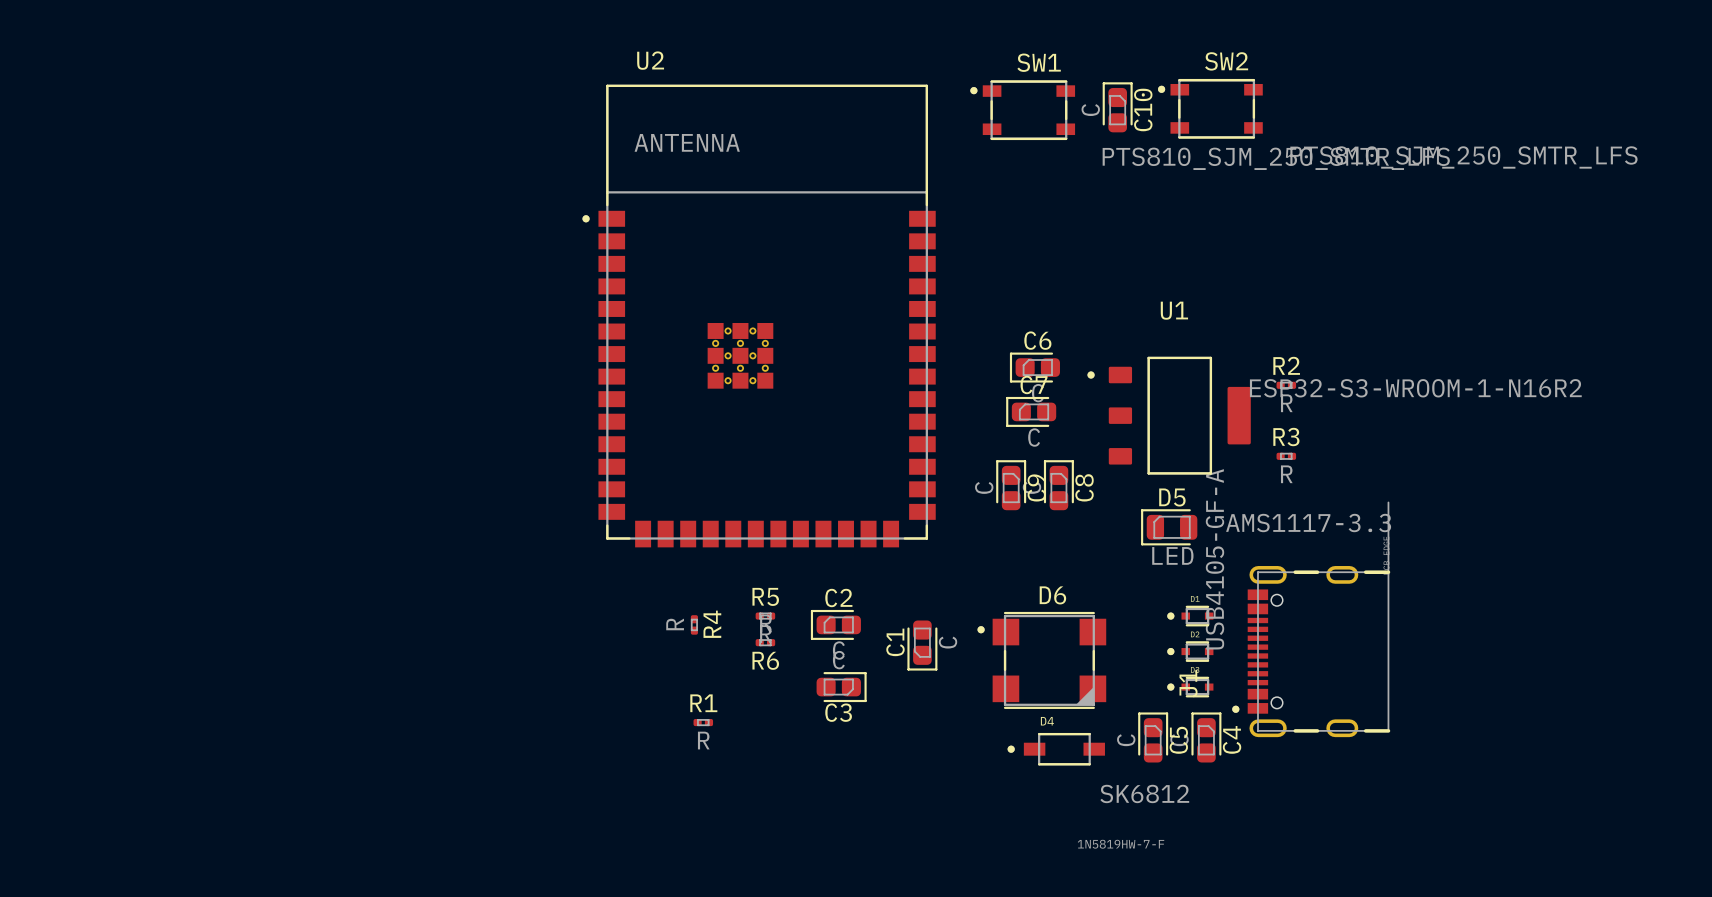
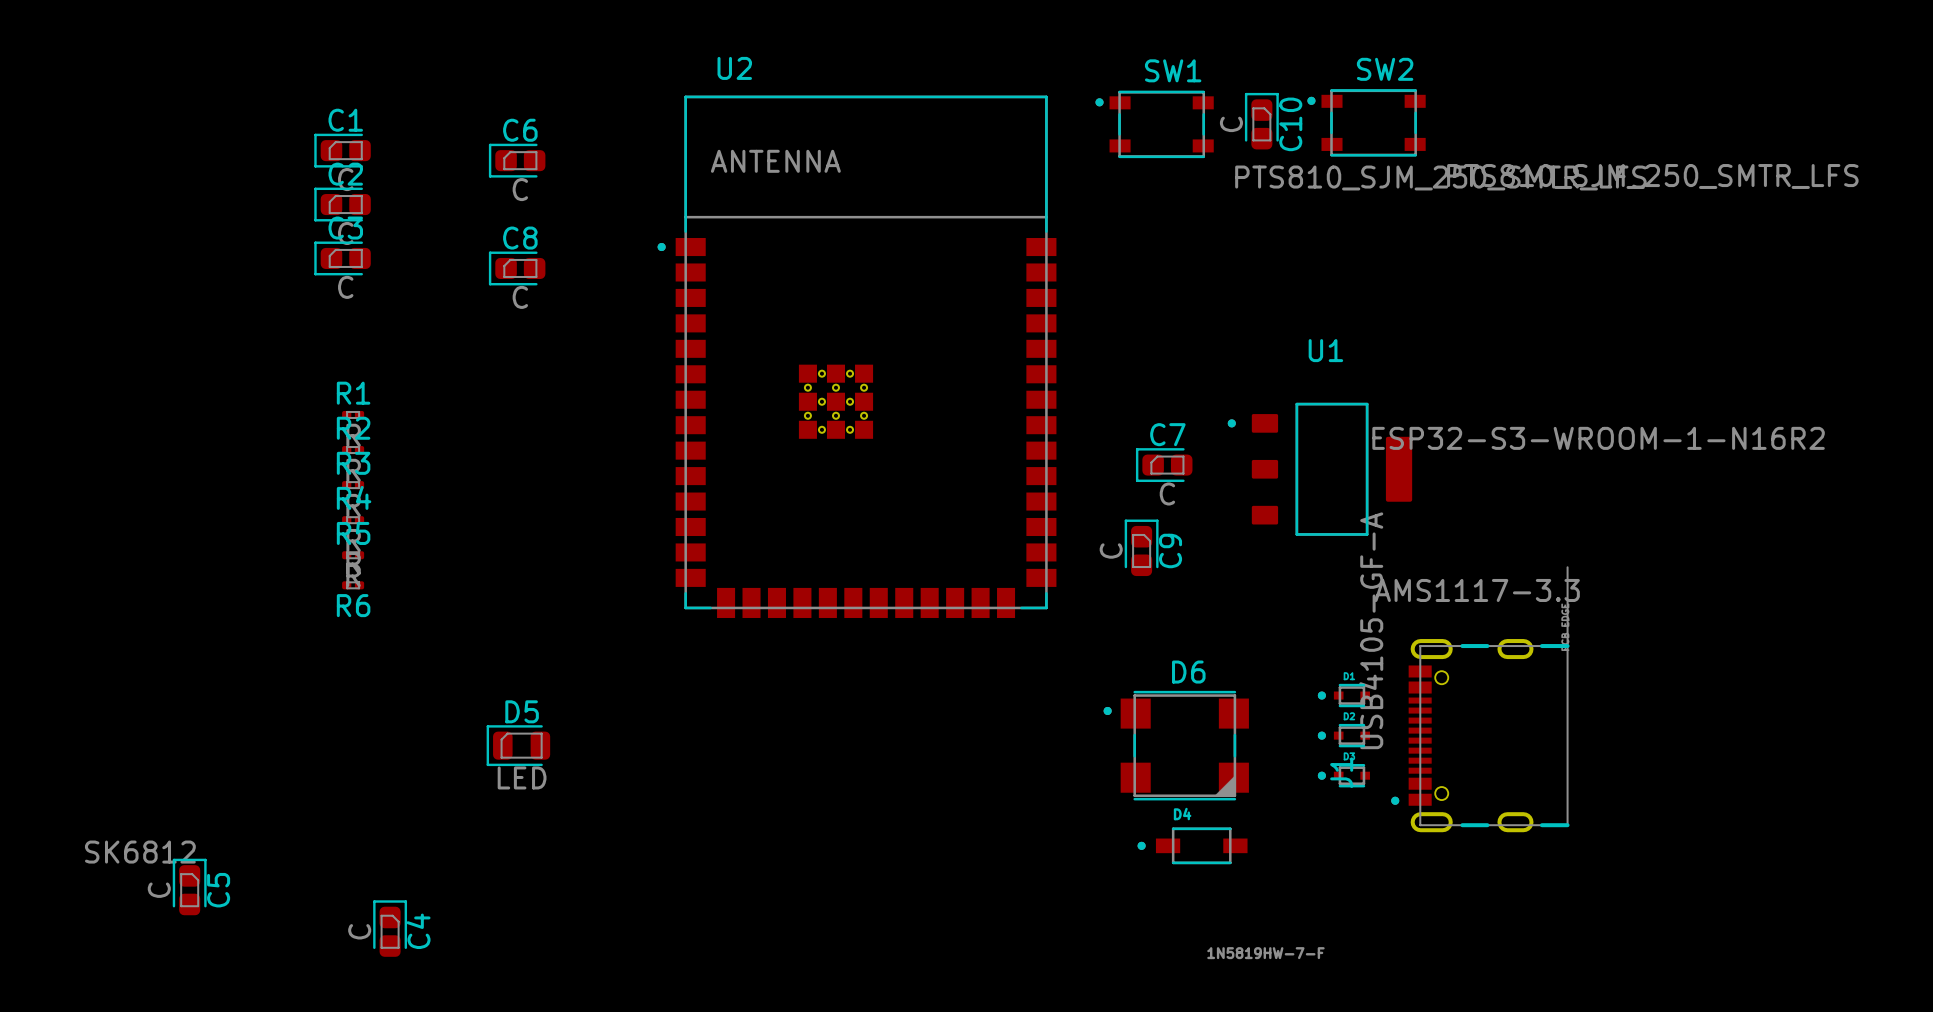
C6 position: (1034, 367) -> (517, 160)
R2 position: (1286, 385) -> (353, 450)
R3 position: (1286, 456) -> (353, 485)
C8 rotation: 0° (1058, 485) -> 90° counterclockwise (517, 268)
C8 position: (1058, 485) -> (517, 268)
D5 position: (1169, 527) -> (518, 745)
R5 position: (765, 616) -> (353, 555)
R4 rotation: 0° (694, 624) -> 90° clockwise (353, 520)
R4 position: (694, 624) -> (353, 520)
C2 position: (835, 624) -> (342, 204)
R6 position: (765, 642) -> (353, 585)
C1 rotation: 0° (922, 645) -> 90° clockwise (342, 150)
C1 position: (922, 645) -> (342, 150)
C3 rotation: 0° (841, 687) -> 180° (342, 258)
C3 position: (841, 687) -> (342, 258)
R1 position: (703, 722) -> (353, 414)
C5 position: (1153, 737) -> (189, 886)
C4 position: (1206, 737) -> (390, 928)
D6 value position: SK6812 (1144, 793) -> SK6812 (140, 852)

